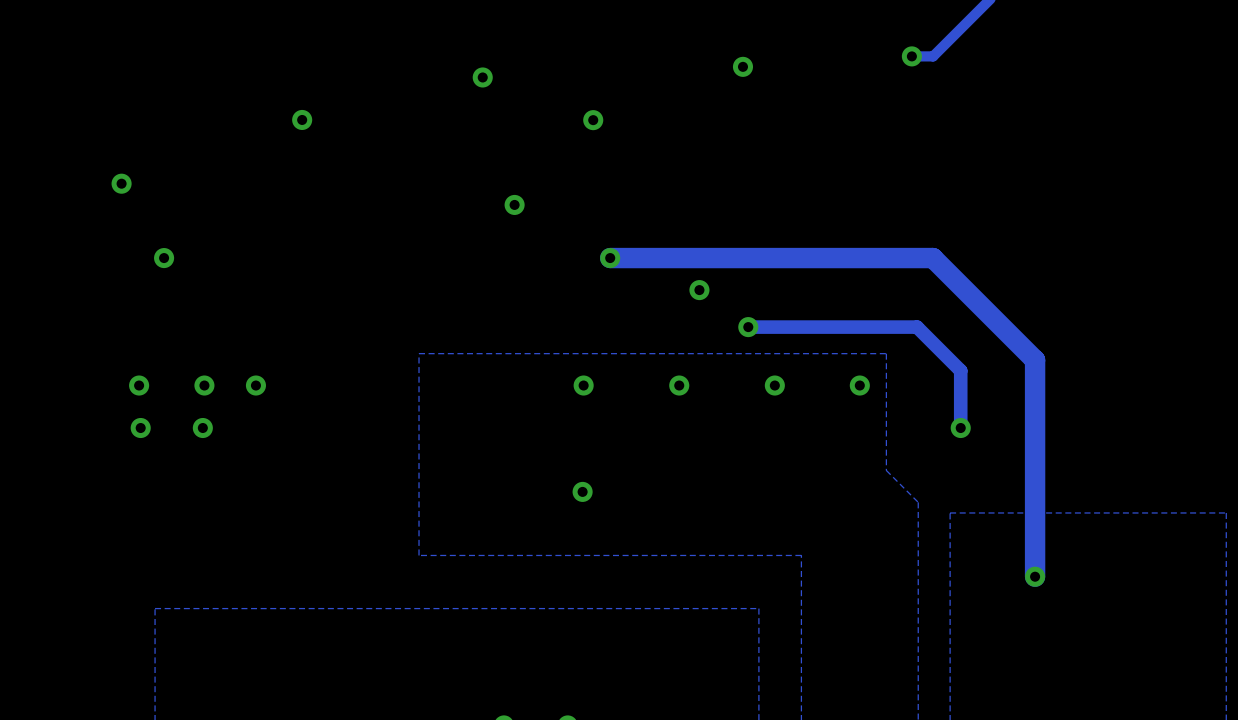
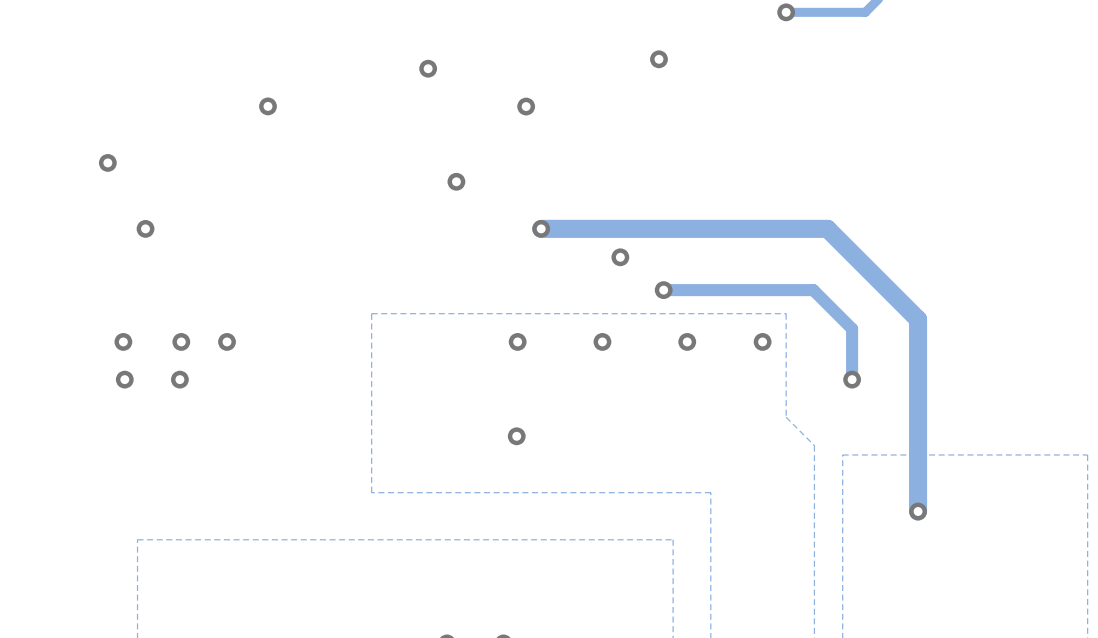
track: (975, 13) (933, 56) (911, 56) -> (865, 12) (786, 12)
via position: (911, 56) -> (786, 12)

